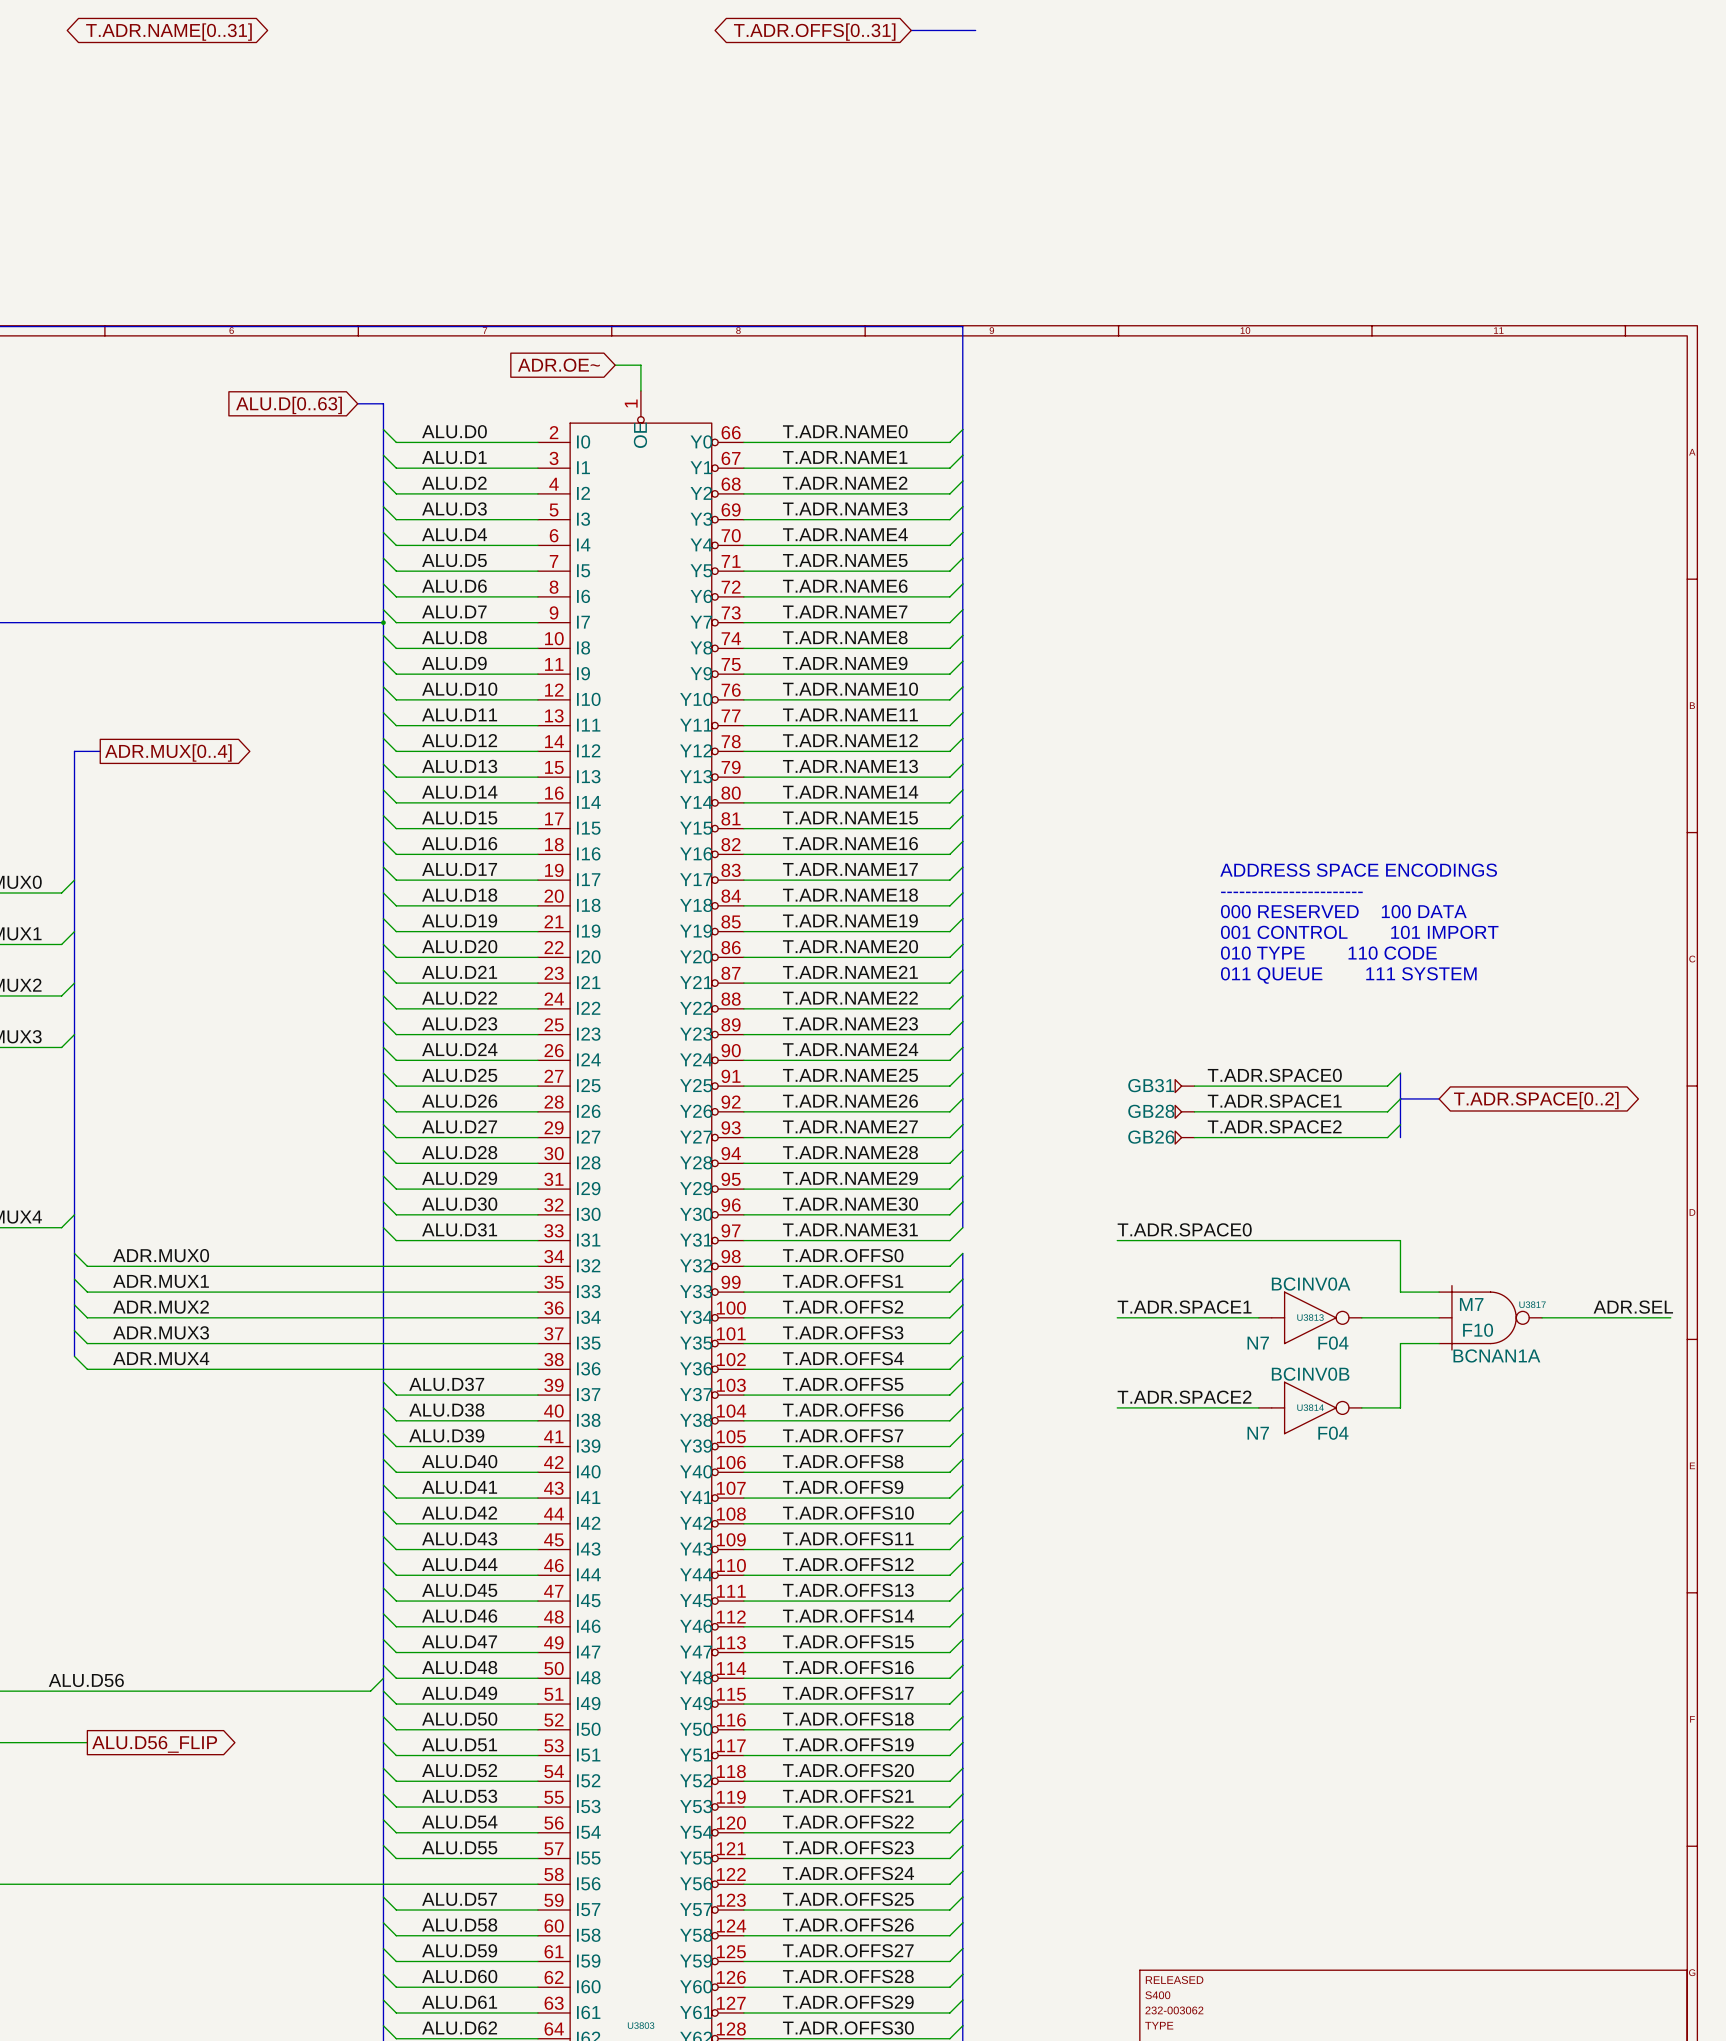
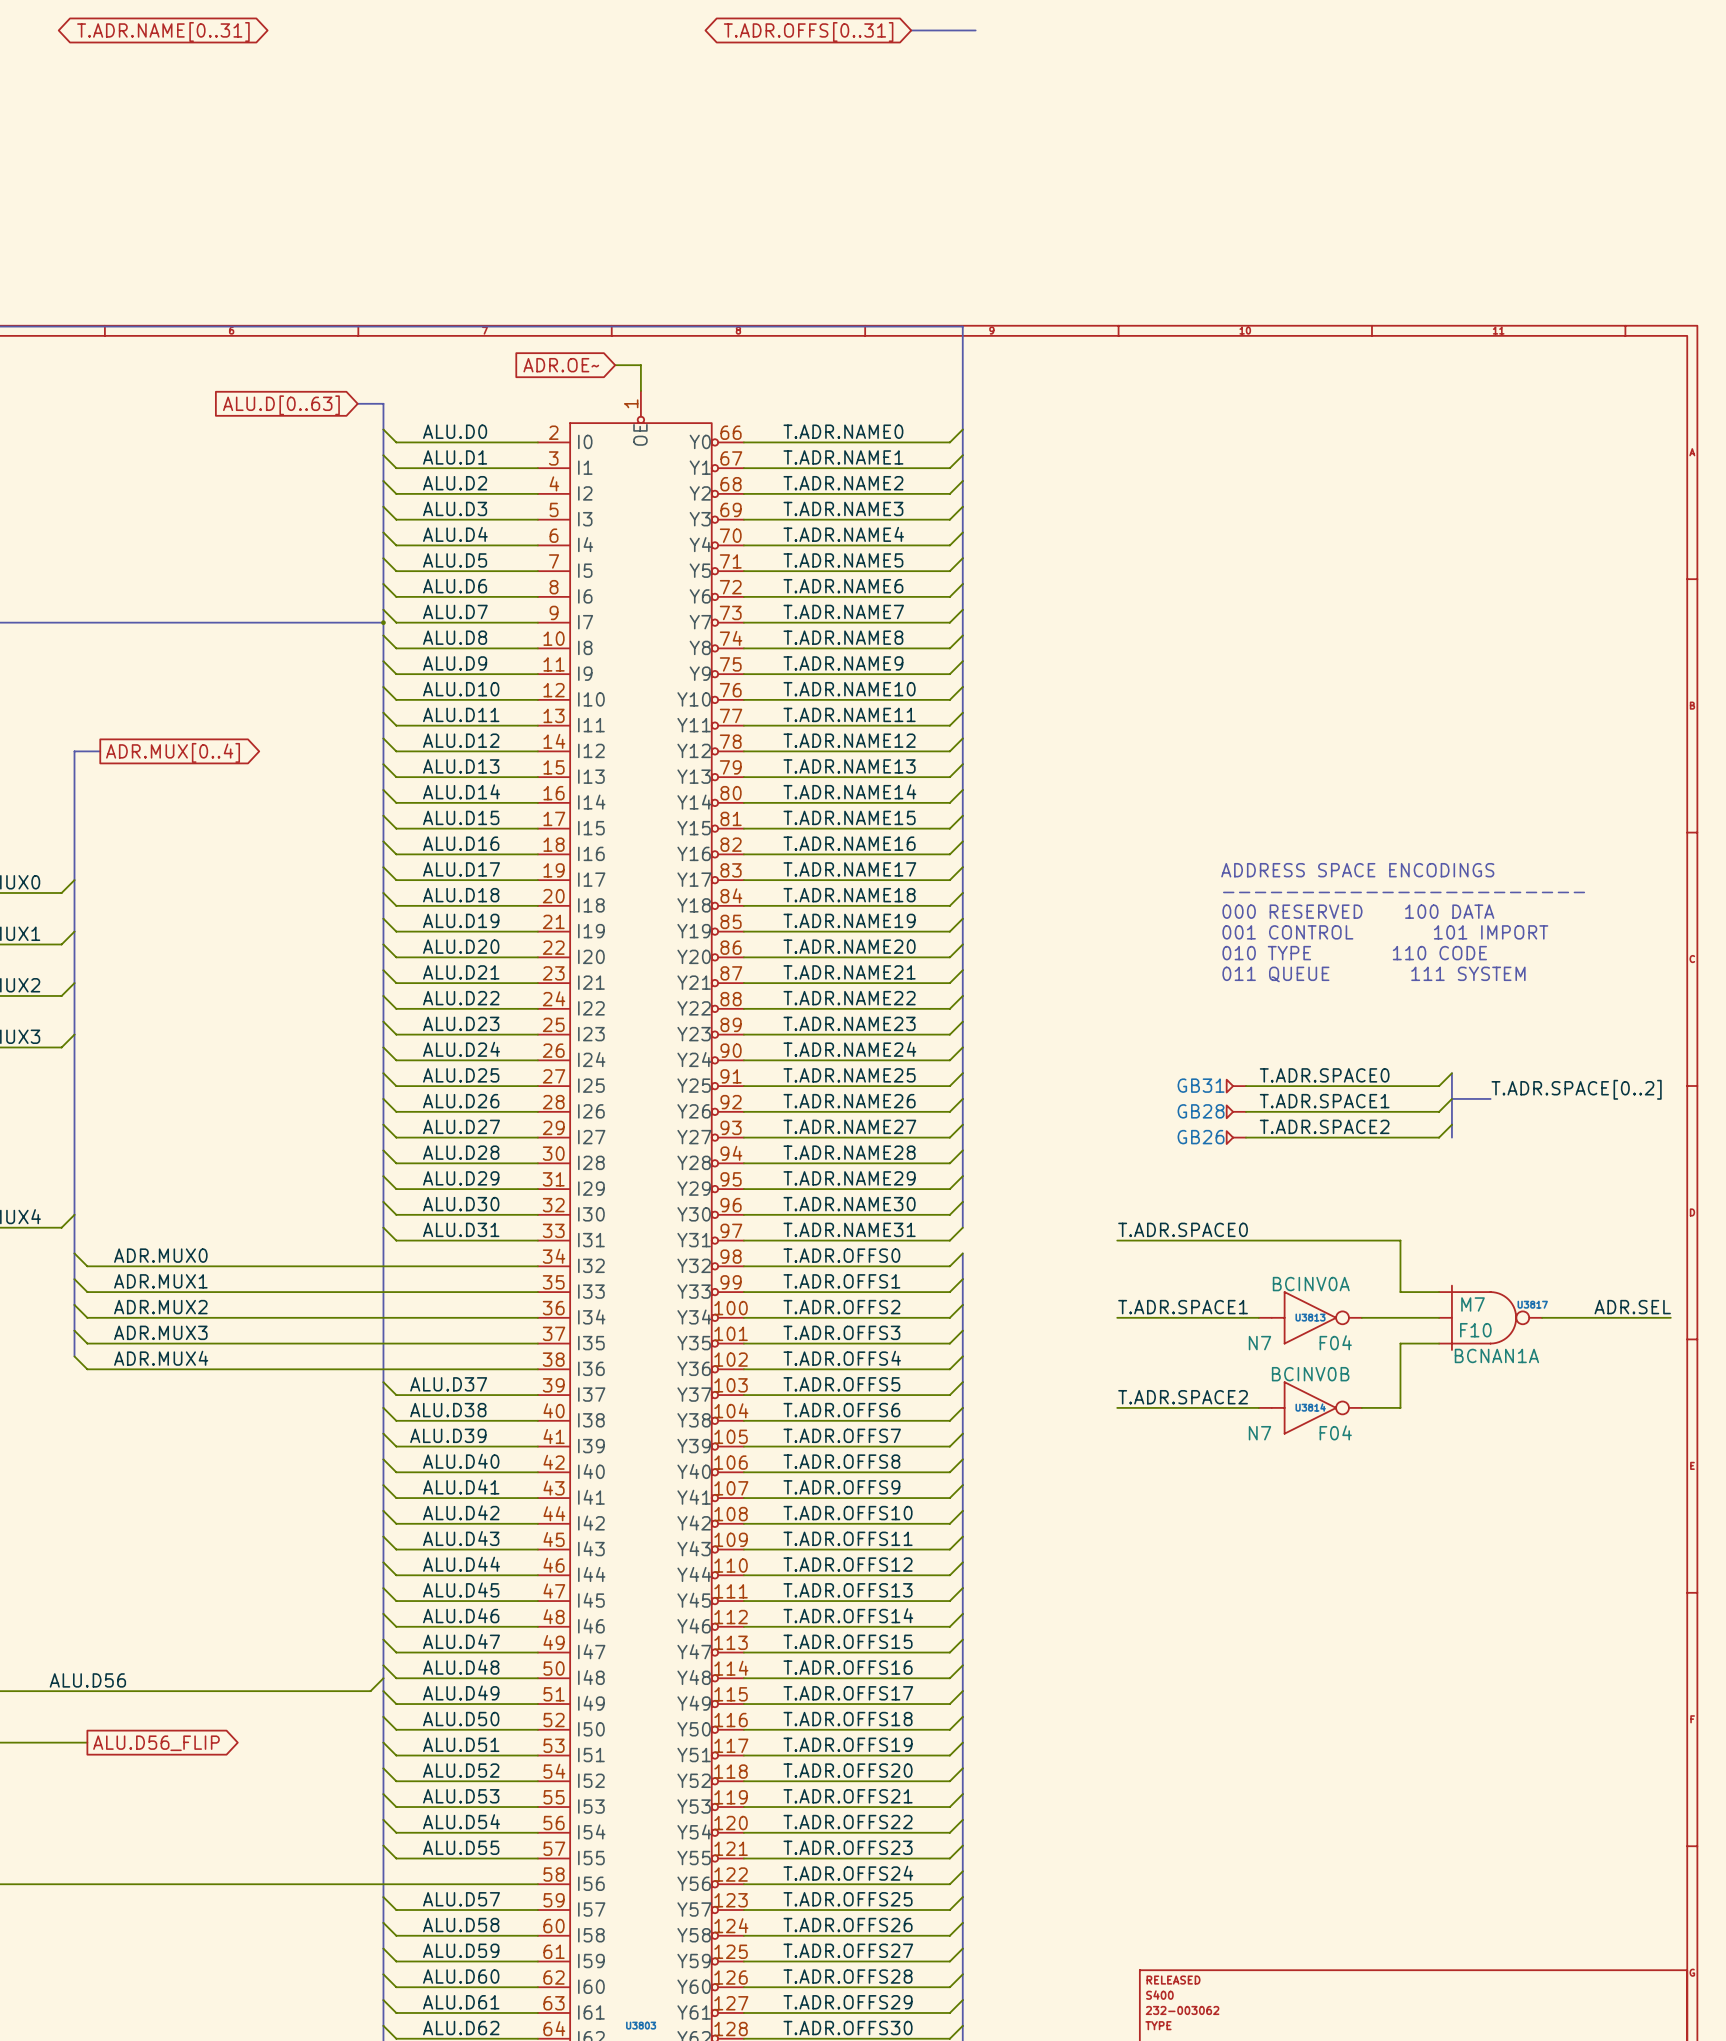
bus: (1400, 1073) (1400, 1137) -> (1451, 1073) (1451, 1137)
wire: (1400, 1073) (1387, 1086) -> (1451, 1073) (1439, 1086) (1387, 1086)
label position: T.ADR.SPACE0 (1274, 1075) -> T.ADR.SPACE0 (1324, 1075)
GB31 position: (1184, 1086) -> (1236, 1086)
label: none -> T.ADR.SPACE[0..2] (1576, 1089)
bus: (1400, 1098) (1439, 1098) -> (1451, 1098) (1490, 1098)
wire: (1400, 1098) (1387, 1111) -> (1451, 1098) (1439, 1111) (1387, 1111)
global label: T.ADR.SPACE[0..2] (1536, 1100) -> none
label position: T.ADR.SPACE1 (1274, 1101) -> T.ADR.SPACE1 (1324, 1101)
GB28 position: (1184, 1111) -> (1236, 1111)
wire: (1400, 1124) (1387, 1137) -> (1451, 1124) (1439, 1137) (1387, 1137)
label position: T.ADR.SPACE2 (1274, 1126) -> T.ADR.SPACE2 (1324, 1126)
GB26 position: (1184, 1137) -> (1236, 1137)

